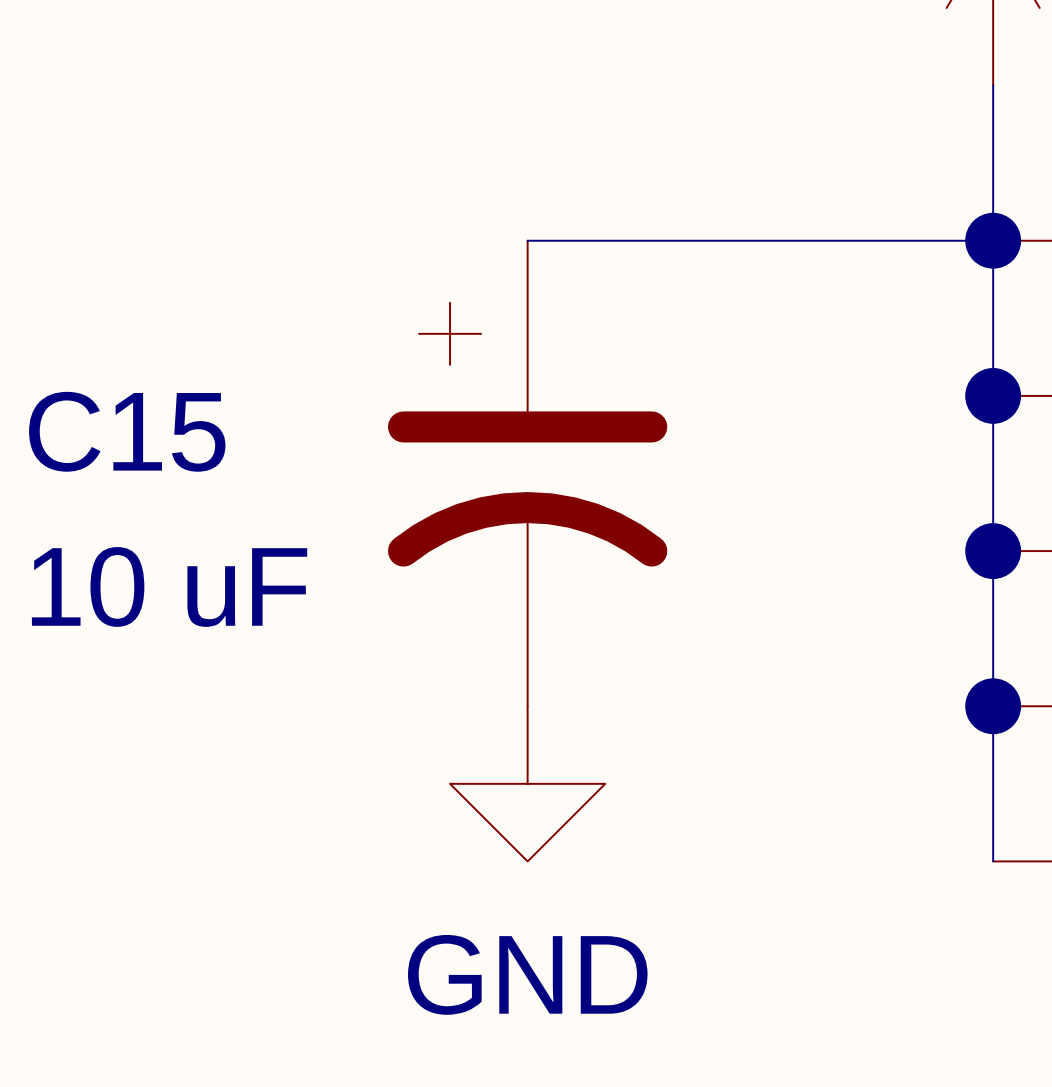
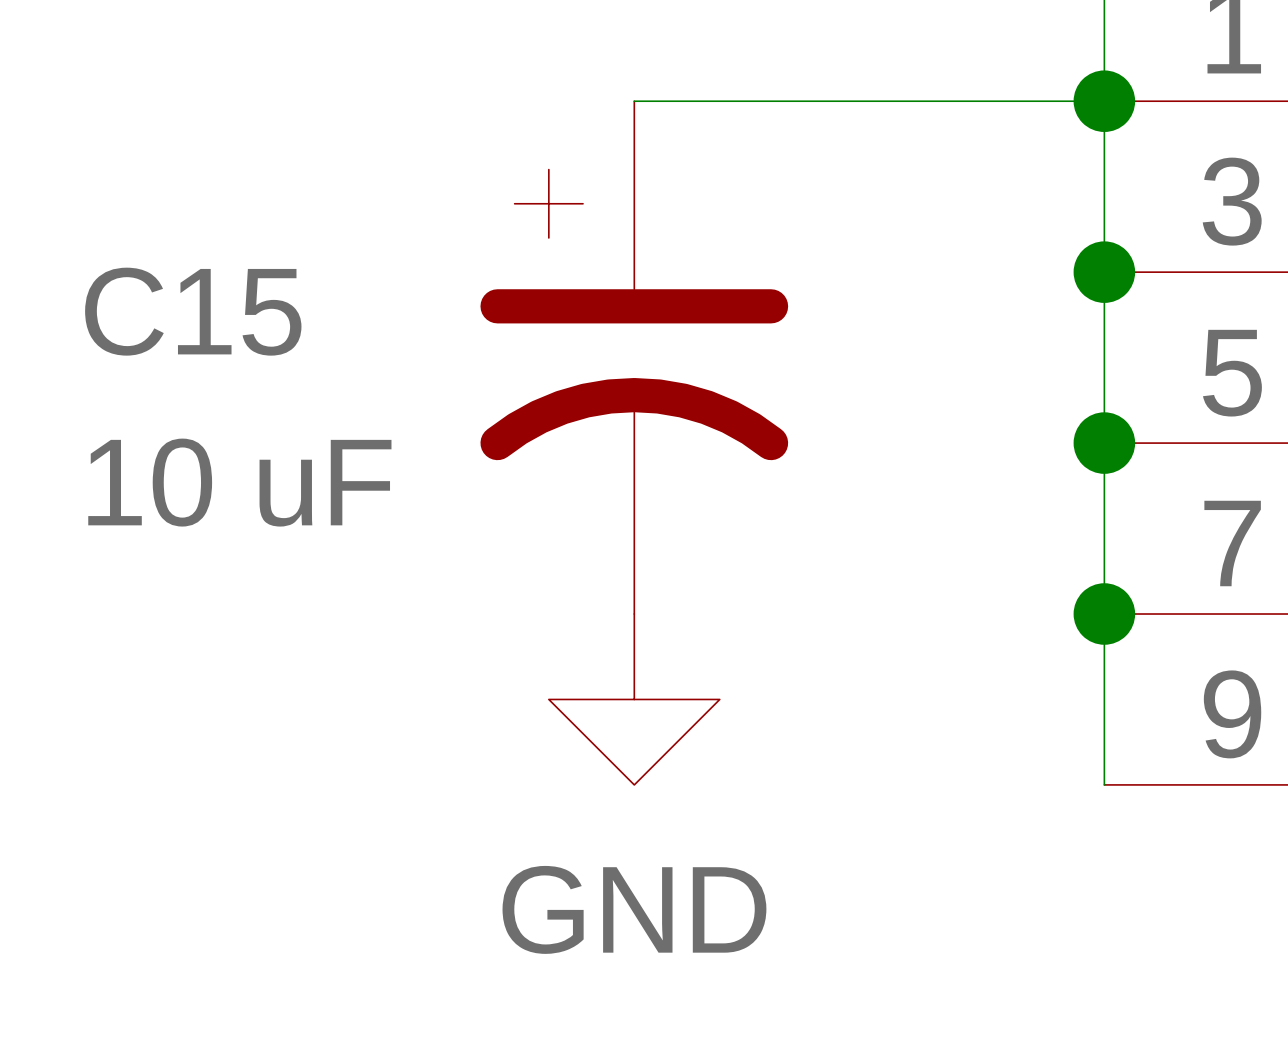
wire: (527, 240) (566, 240) -> none
C15 position: (527, 473) -> (634, 357)
power symbol position: GND (527, 783) -> GND (634, 699)

